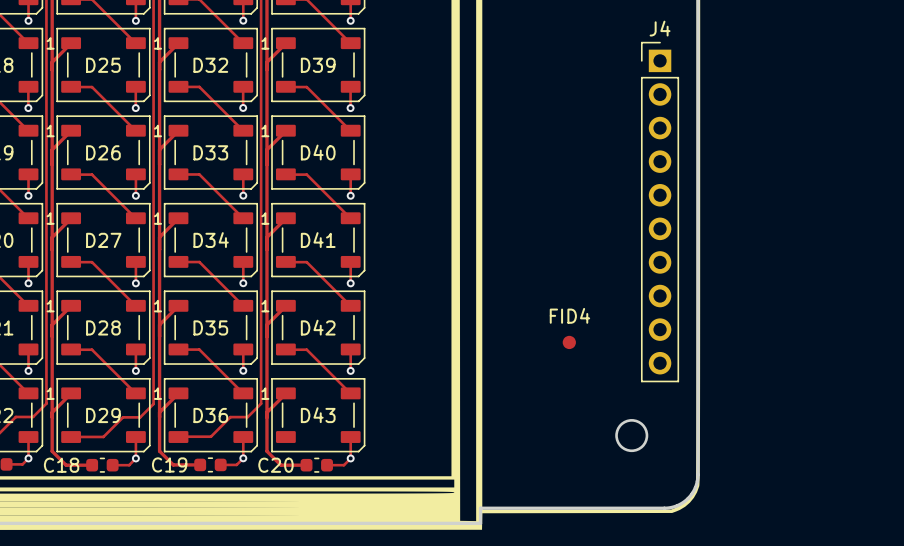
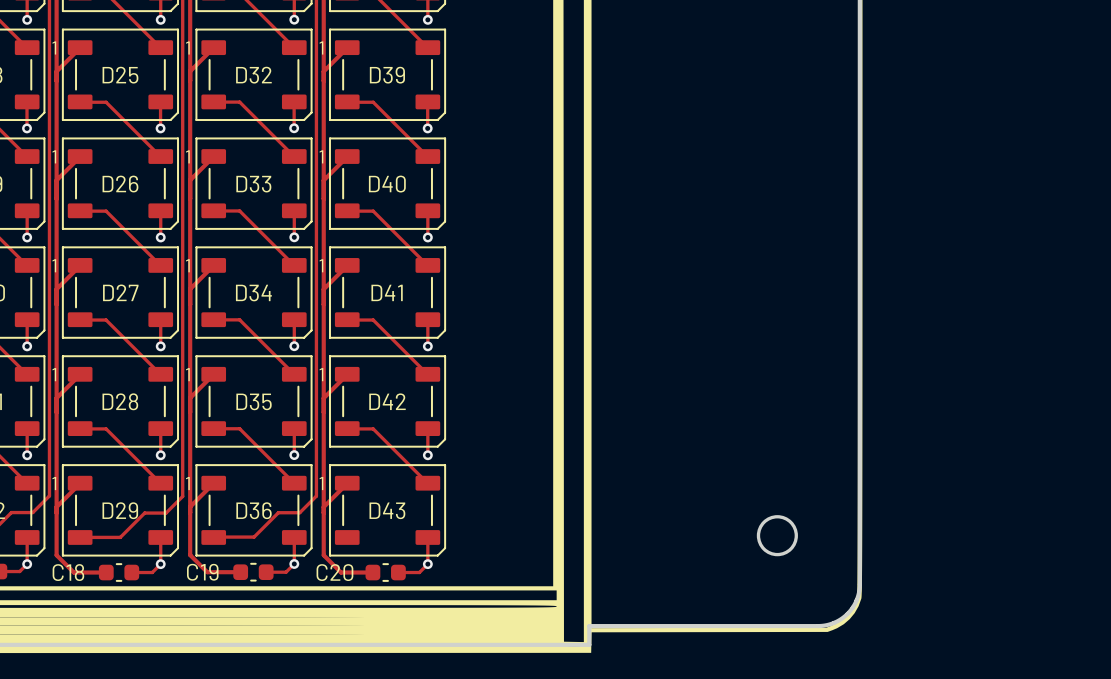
J4: (660, 212) -> none
FID4: (569, 342) -> none

